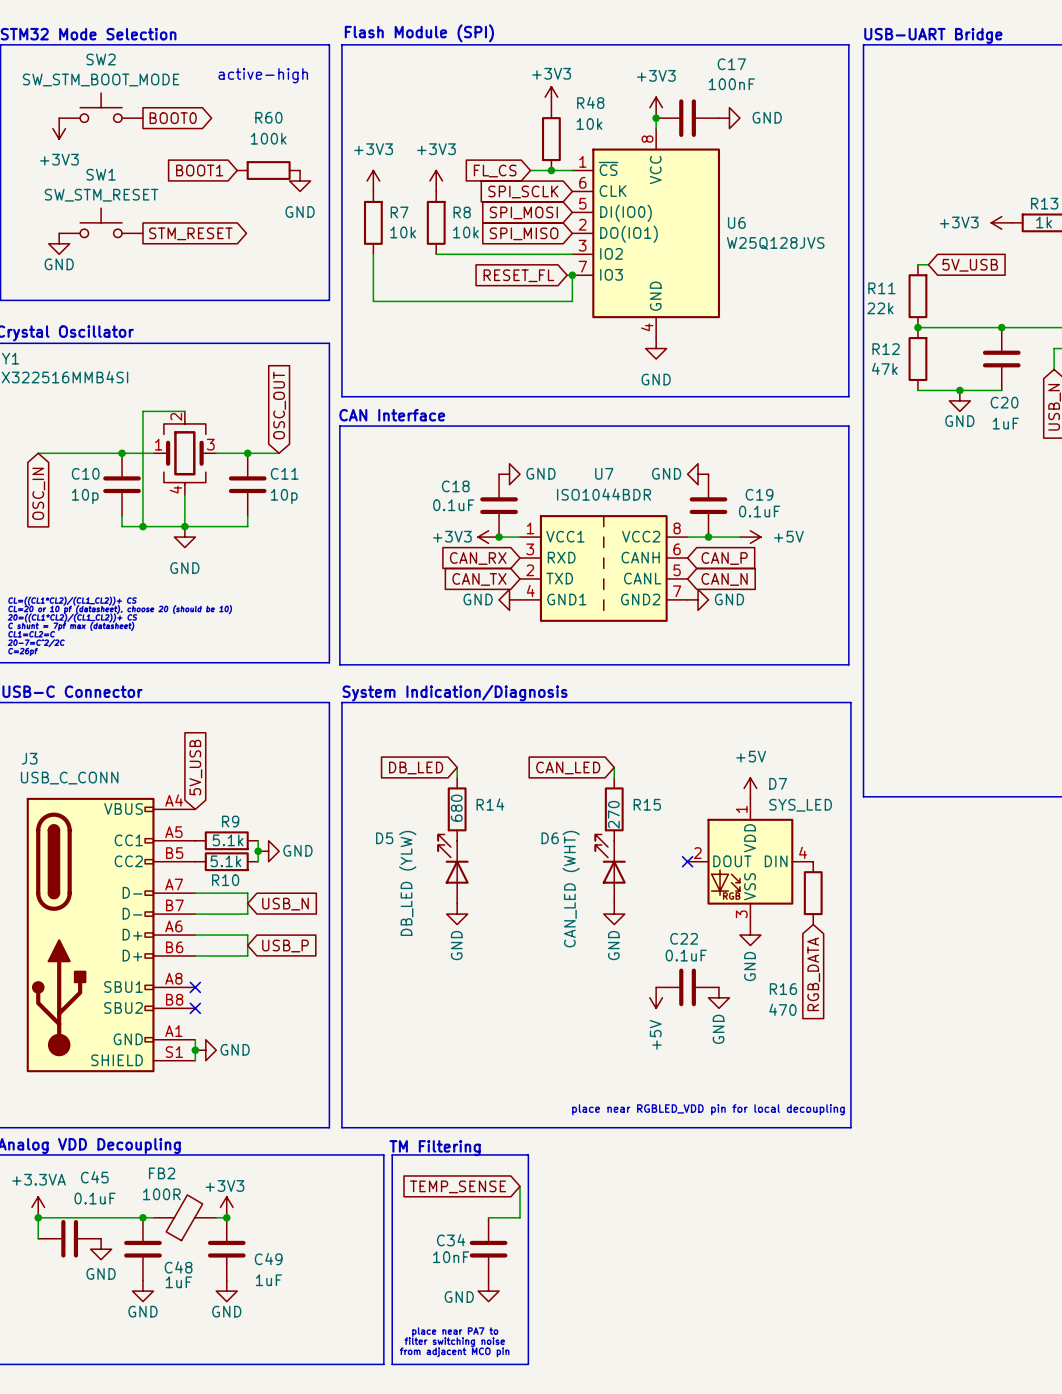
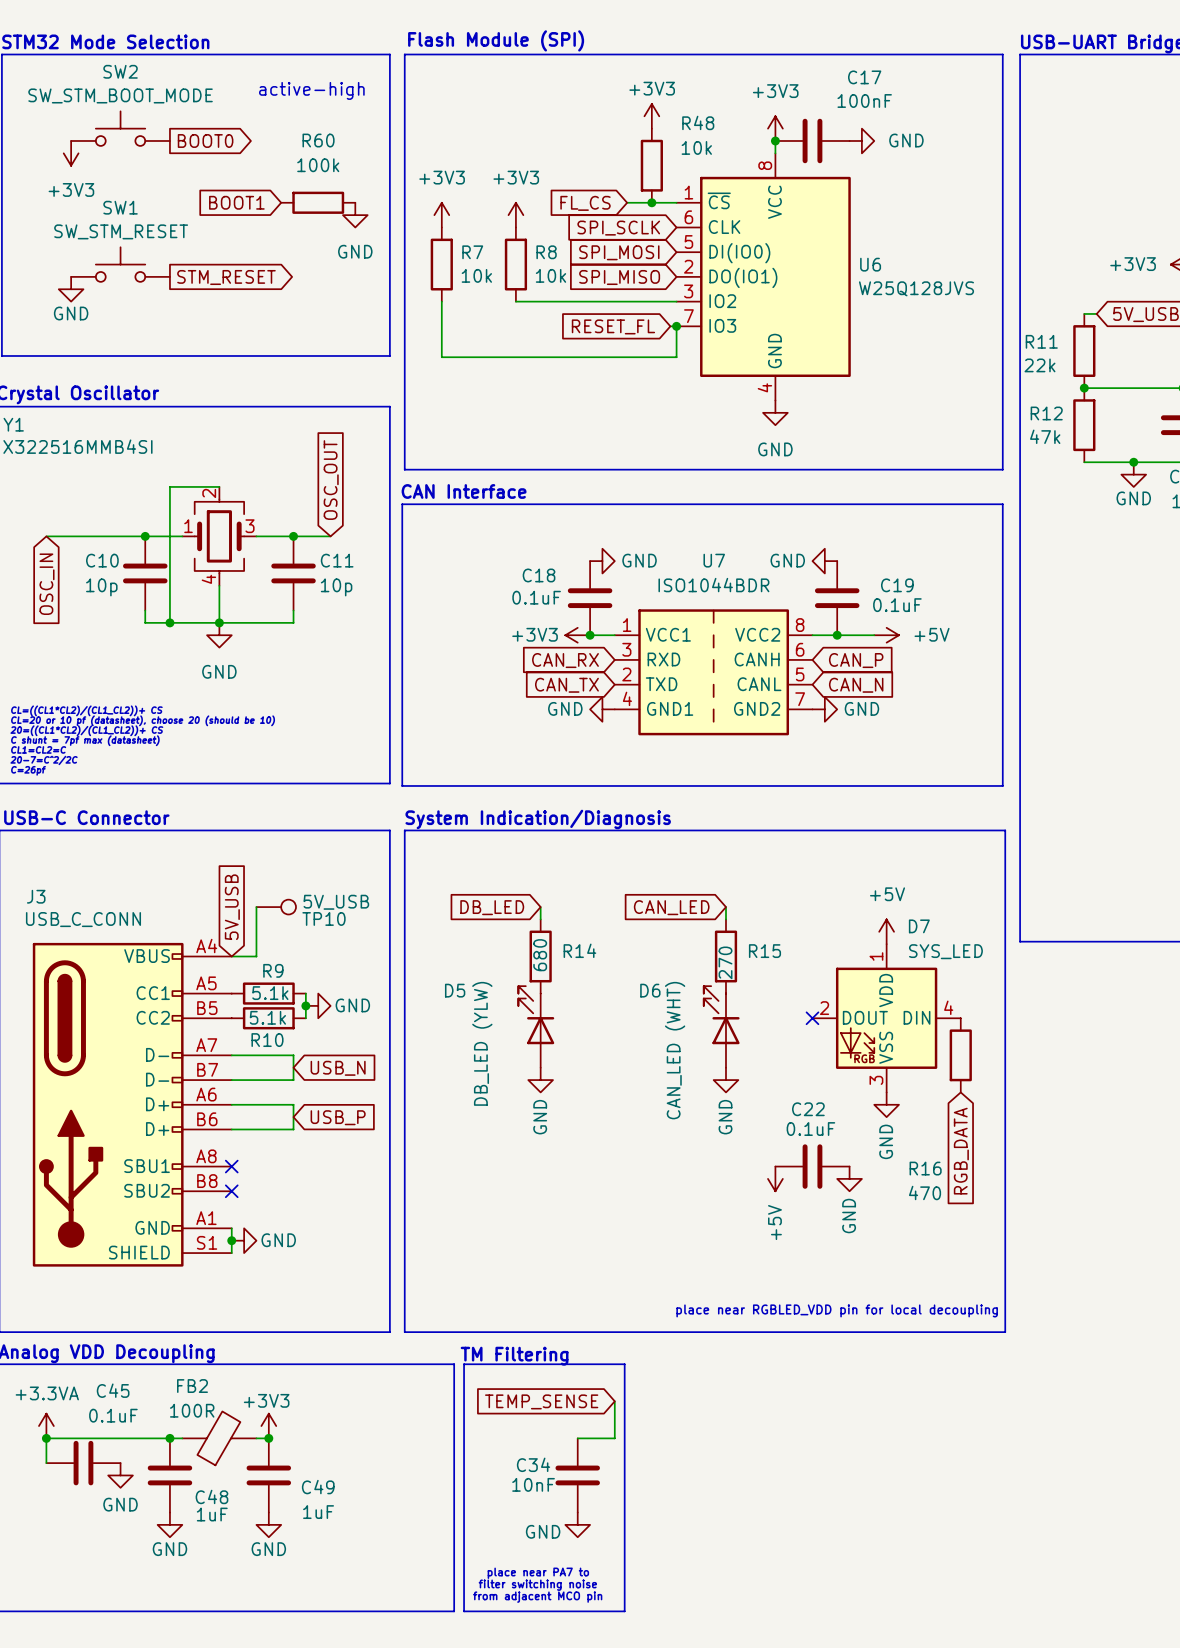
wire: none -> (256, 907) (256, 956) (231, 956)
TP10: none -> 5V_USB (276, 907)

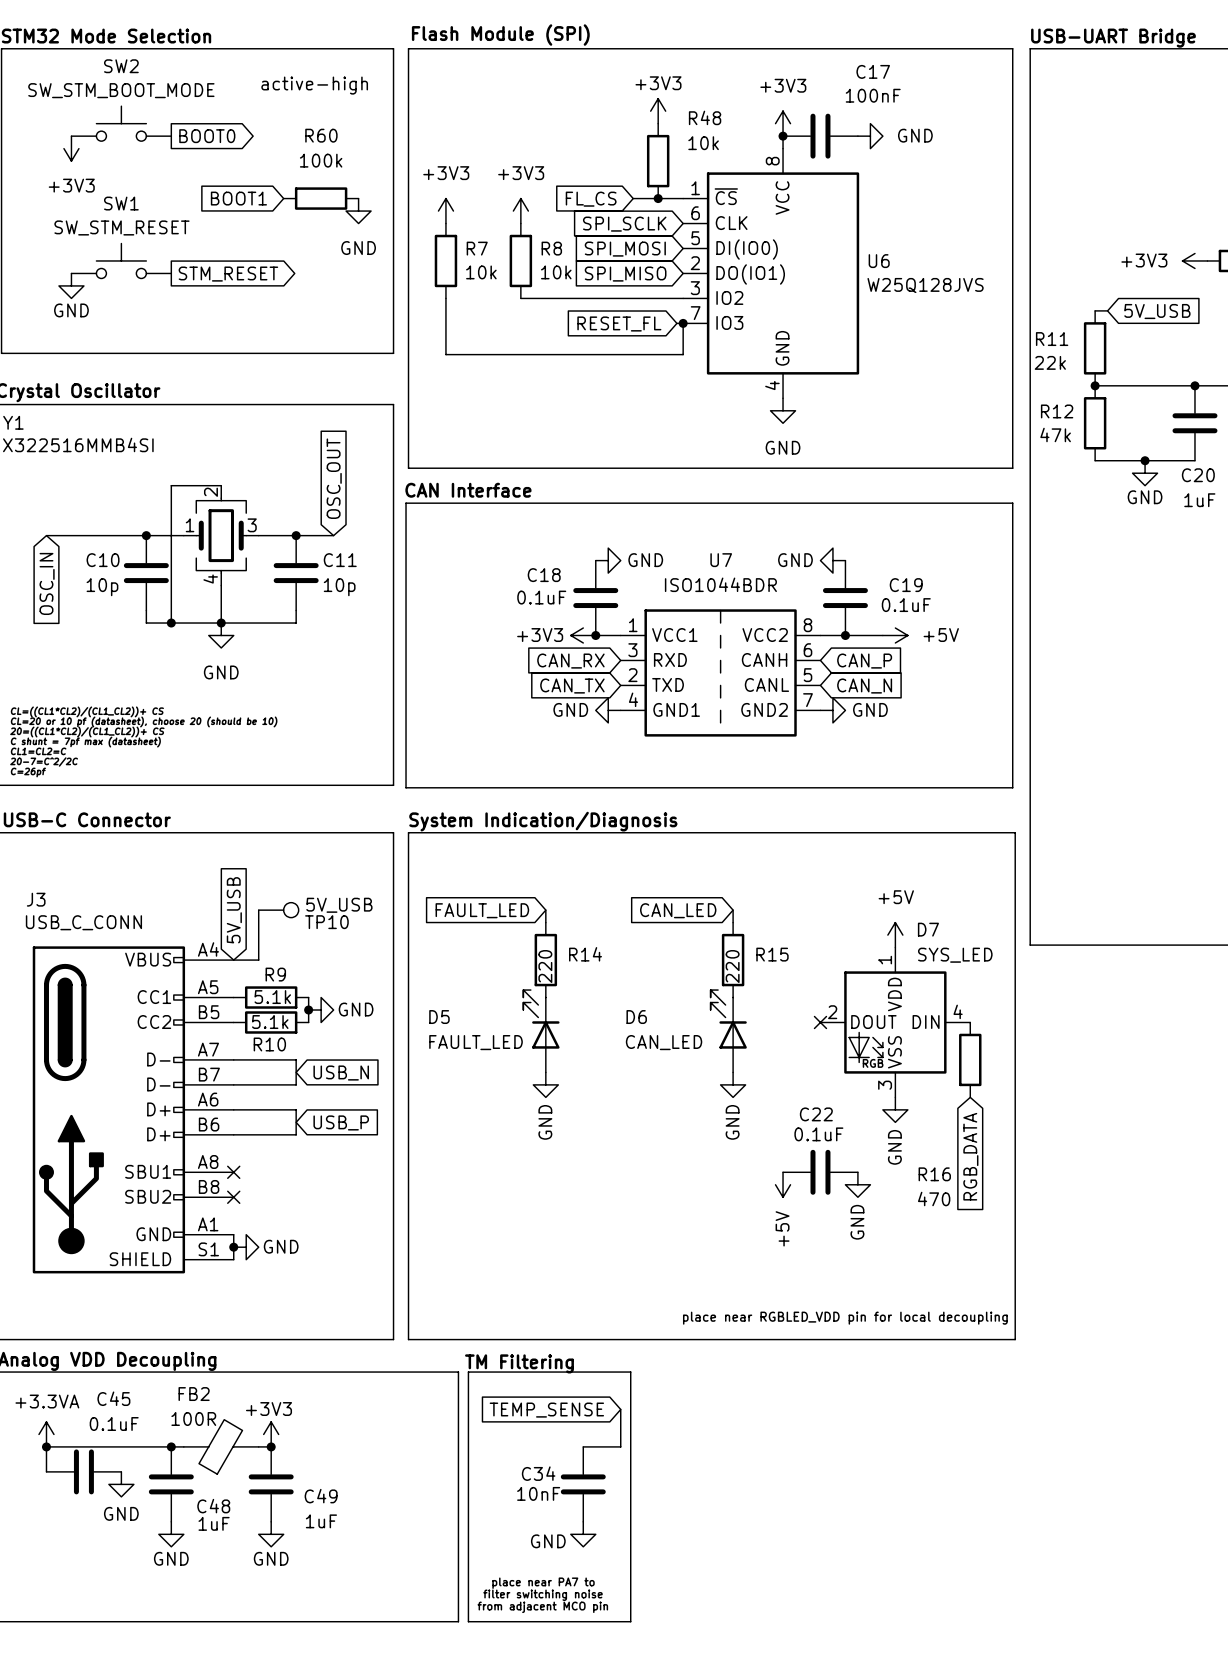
global label: DB_LED (492, 907) -> FAULT_LED (482, 910)
R14 value: 680 (540, 955) -> 220 (545, 966)
R15 value: 270 (725, 962) -> 220 (732, 966)
D5 name position: D5 (455, 990) -> D5 (439, 1017)
D6 name position: D6 (650, 990) -> D6 (636, 1017)
D5 value: DB_LED (YLW) (482, 1043) -> FAULT_LED (476, 1042)
D6 value: CAN_LED (WHT) (675, 1050) -> CAN_LED (664, 1042)

